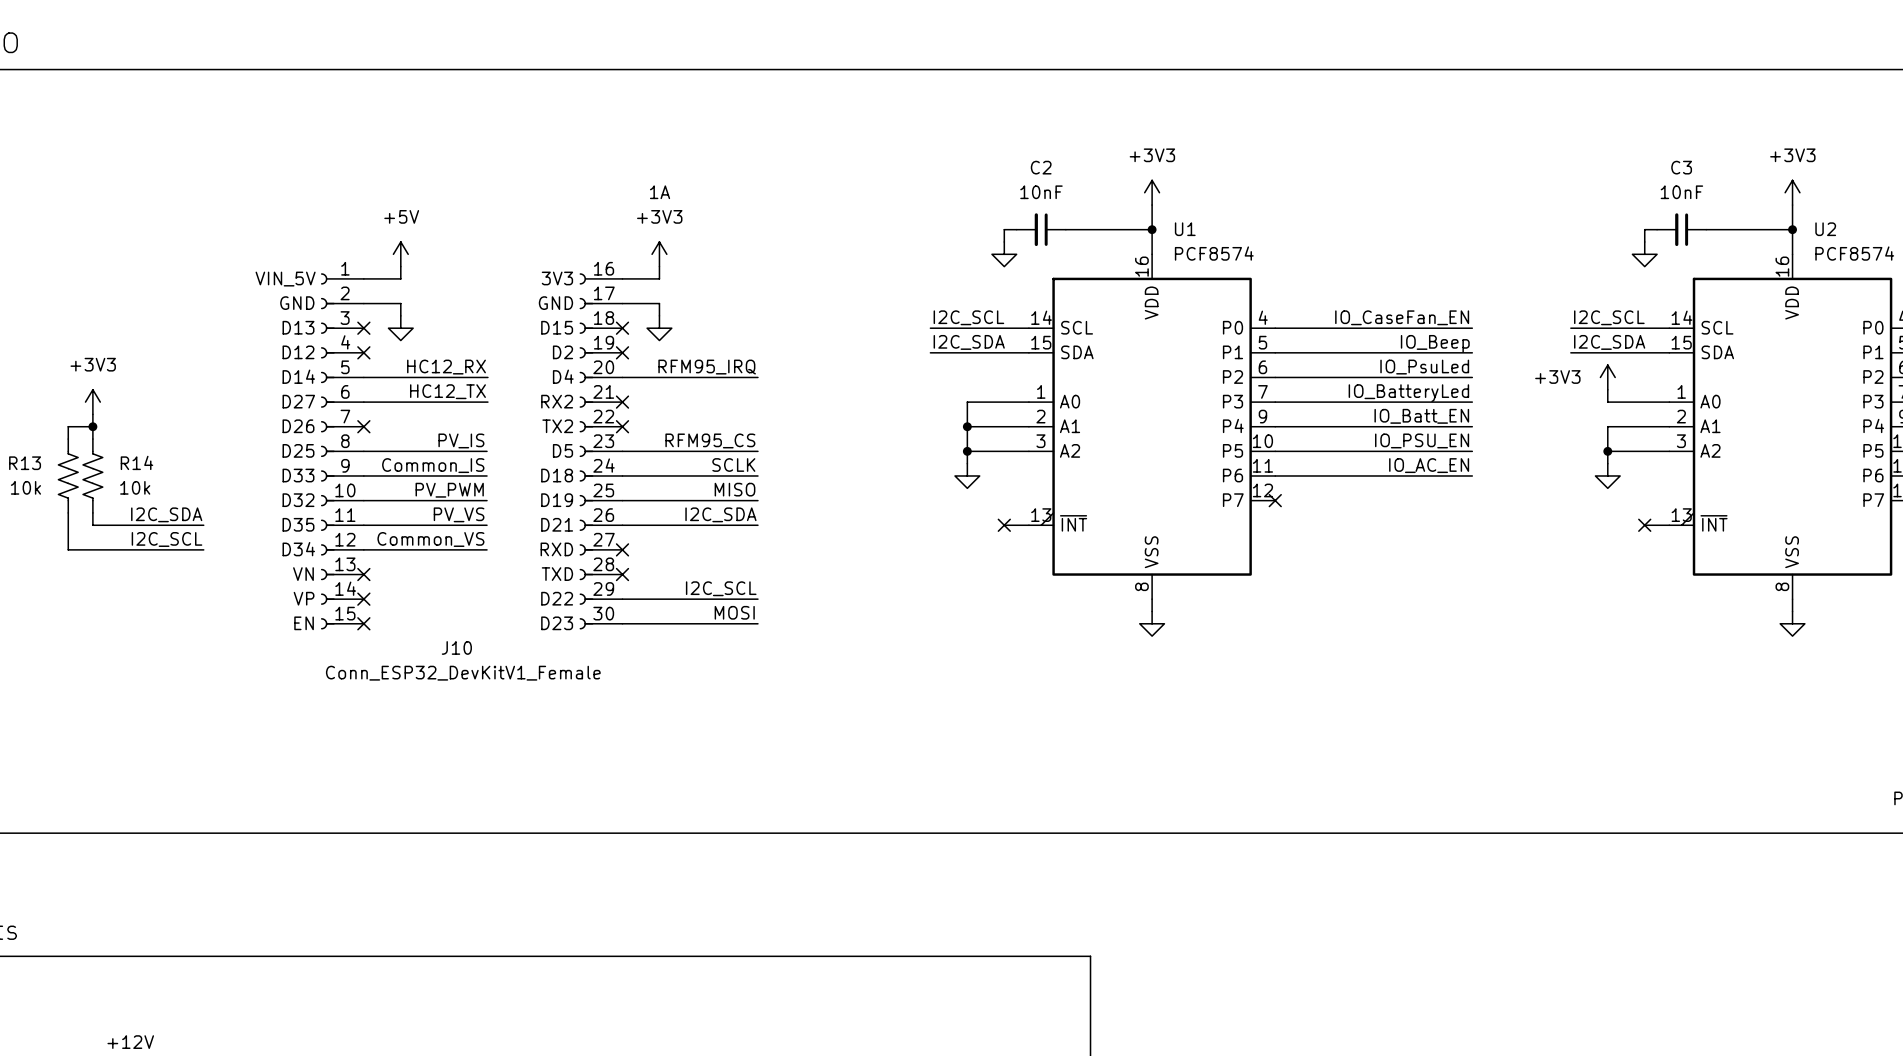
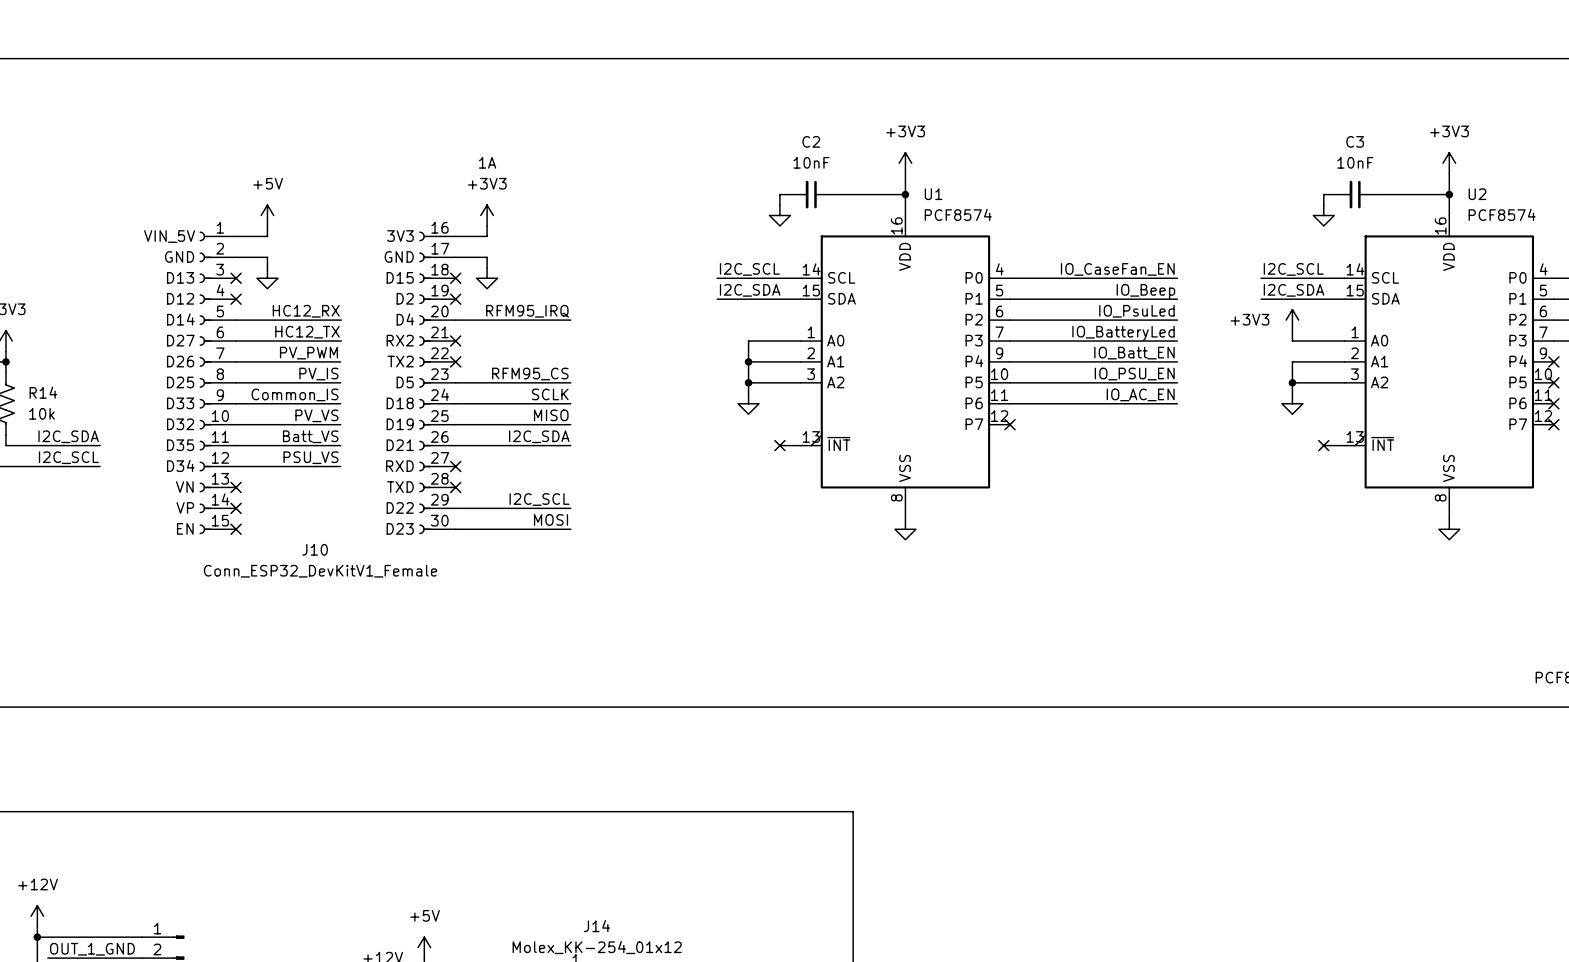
label: none -> PV_PWM (308, 353)
wire: none -> (236, 361) (340, 361)
no-connect mark: (363, 426) -> none
label: PV_PWM (449, 490) -> PV_VS (316, 415)
label: PV_VS (459, 514) -> Batt_VS (310, 436)
label: Common_VS (430, 539) -> PSU_VS (310, 457)

